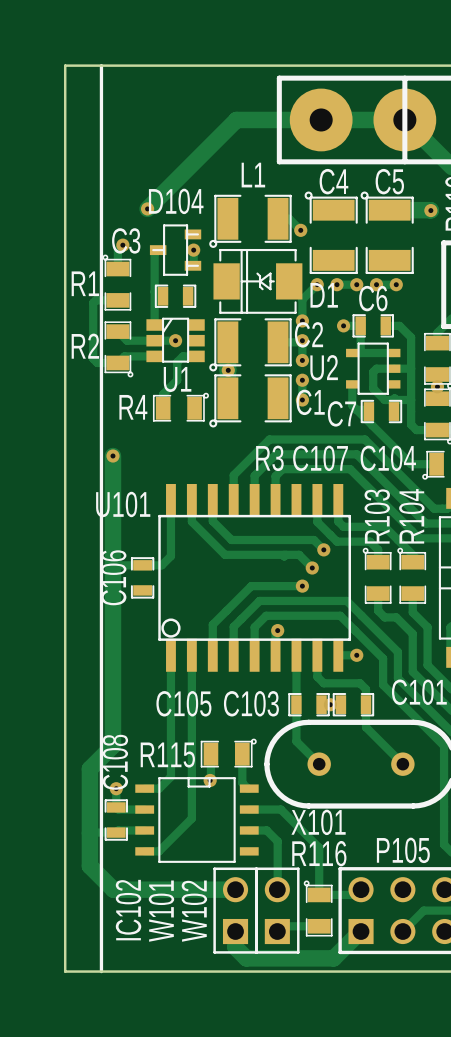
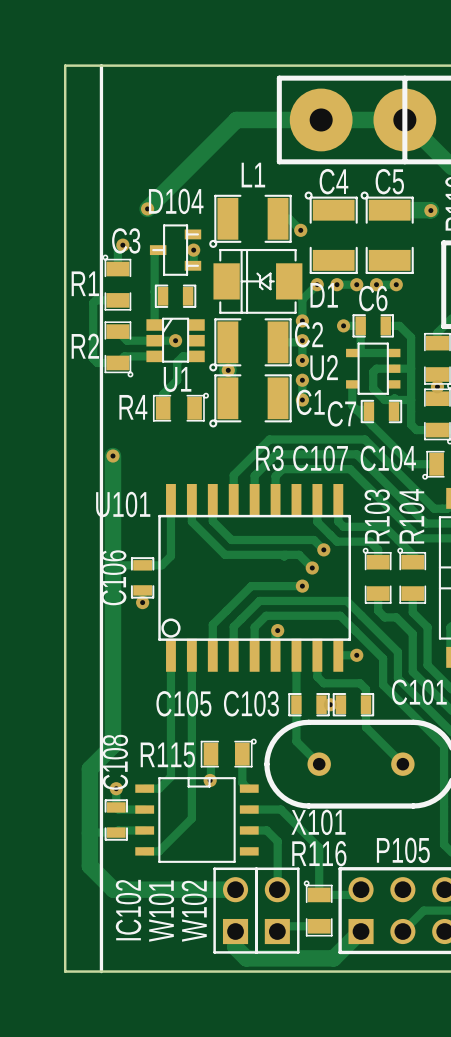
via: none -> (142, 602)

